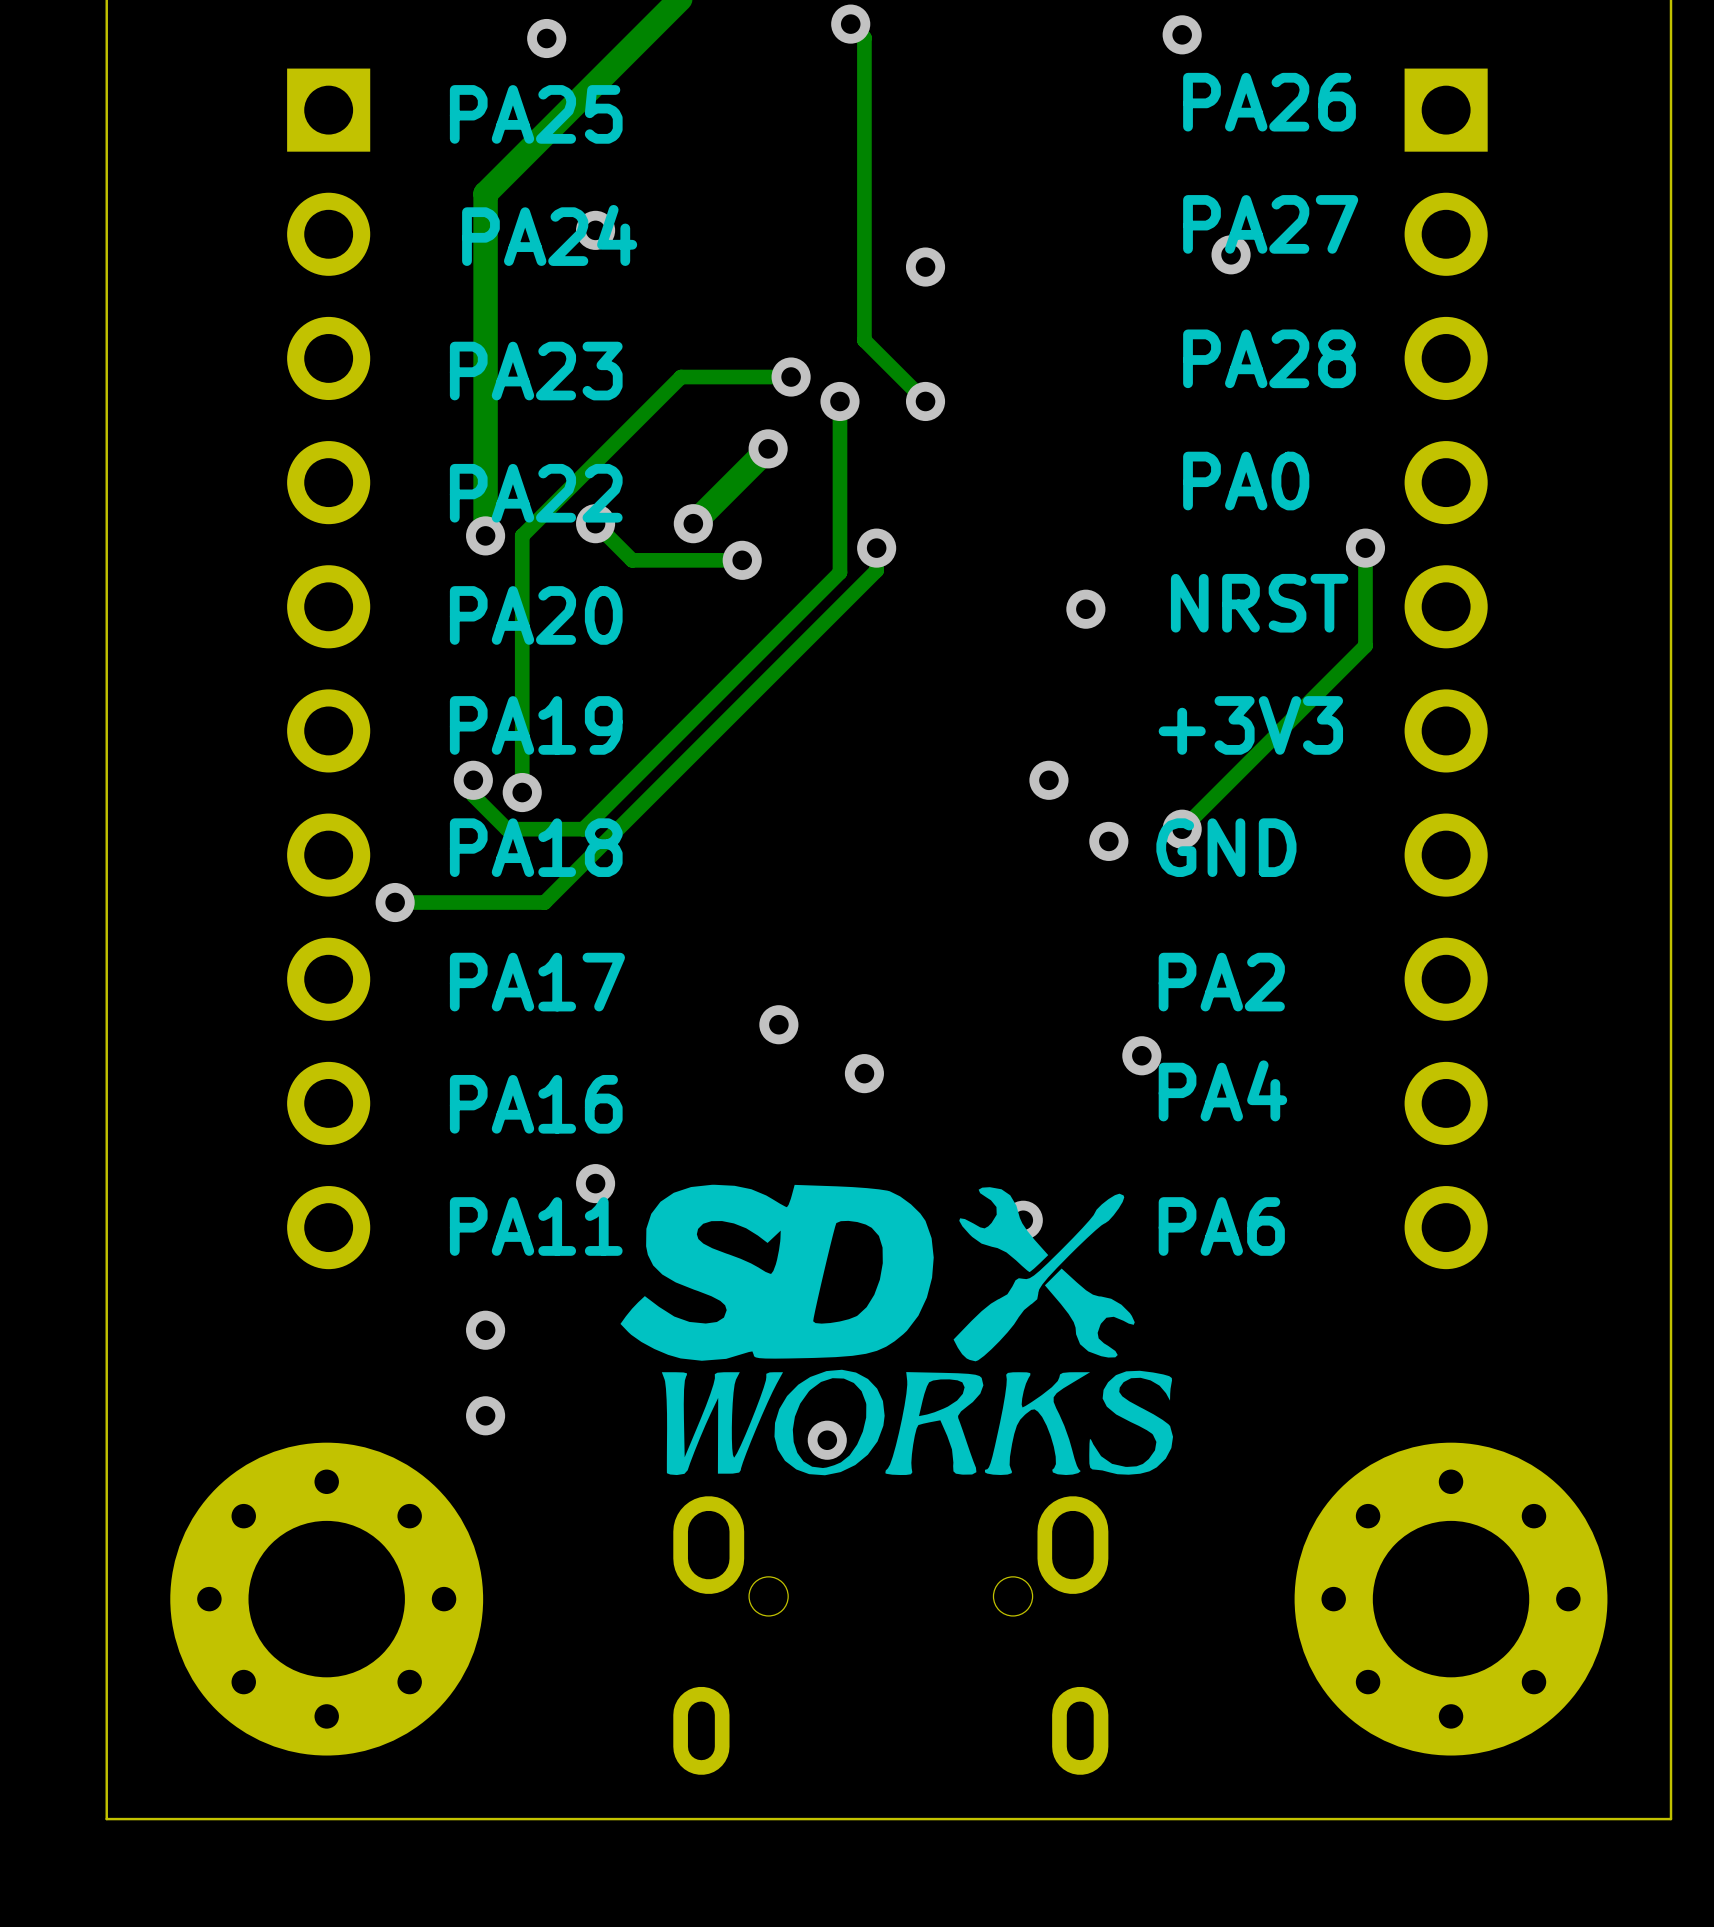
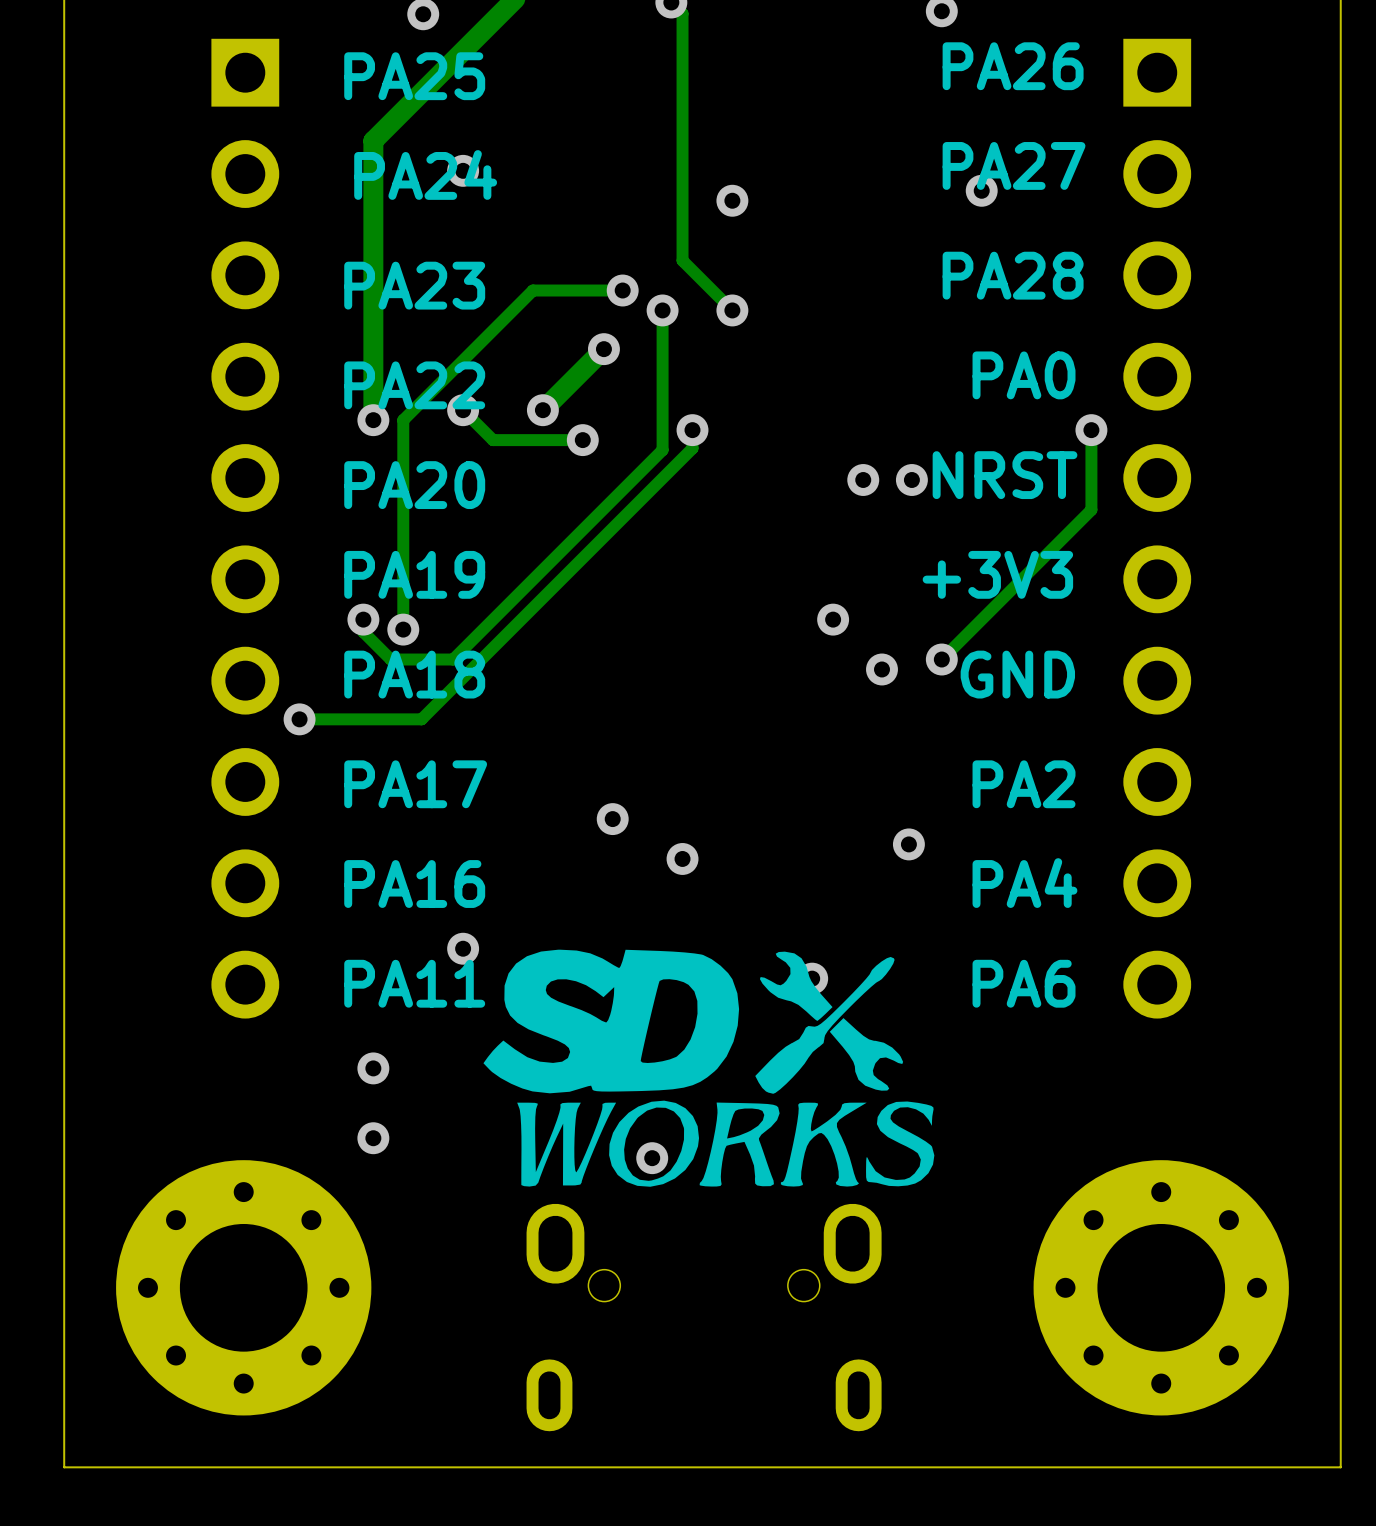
text position: PA0 (1246, 481) -> PA0 (1024, 375)
via: none -> (911, 480)
text position: GND (1226, 847) -> GND (1017, 674)
text position: PA2 (1221, 982) -> PA2 (1024, 784)
text position: PA4 (1222, 1090) -> PA4 (1024, 883)
text position: PA6 (1221, 1226) -> PA6 (1024, 983)

